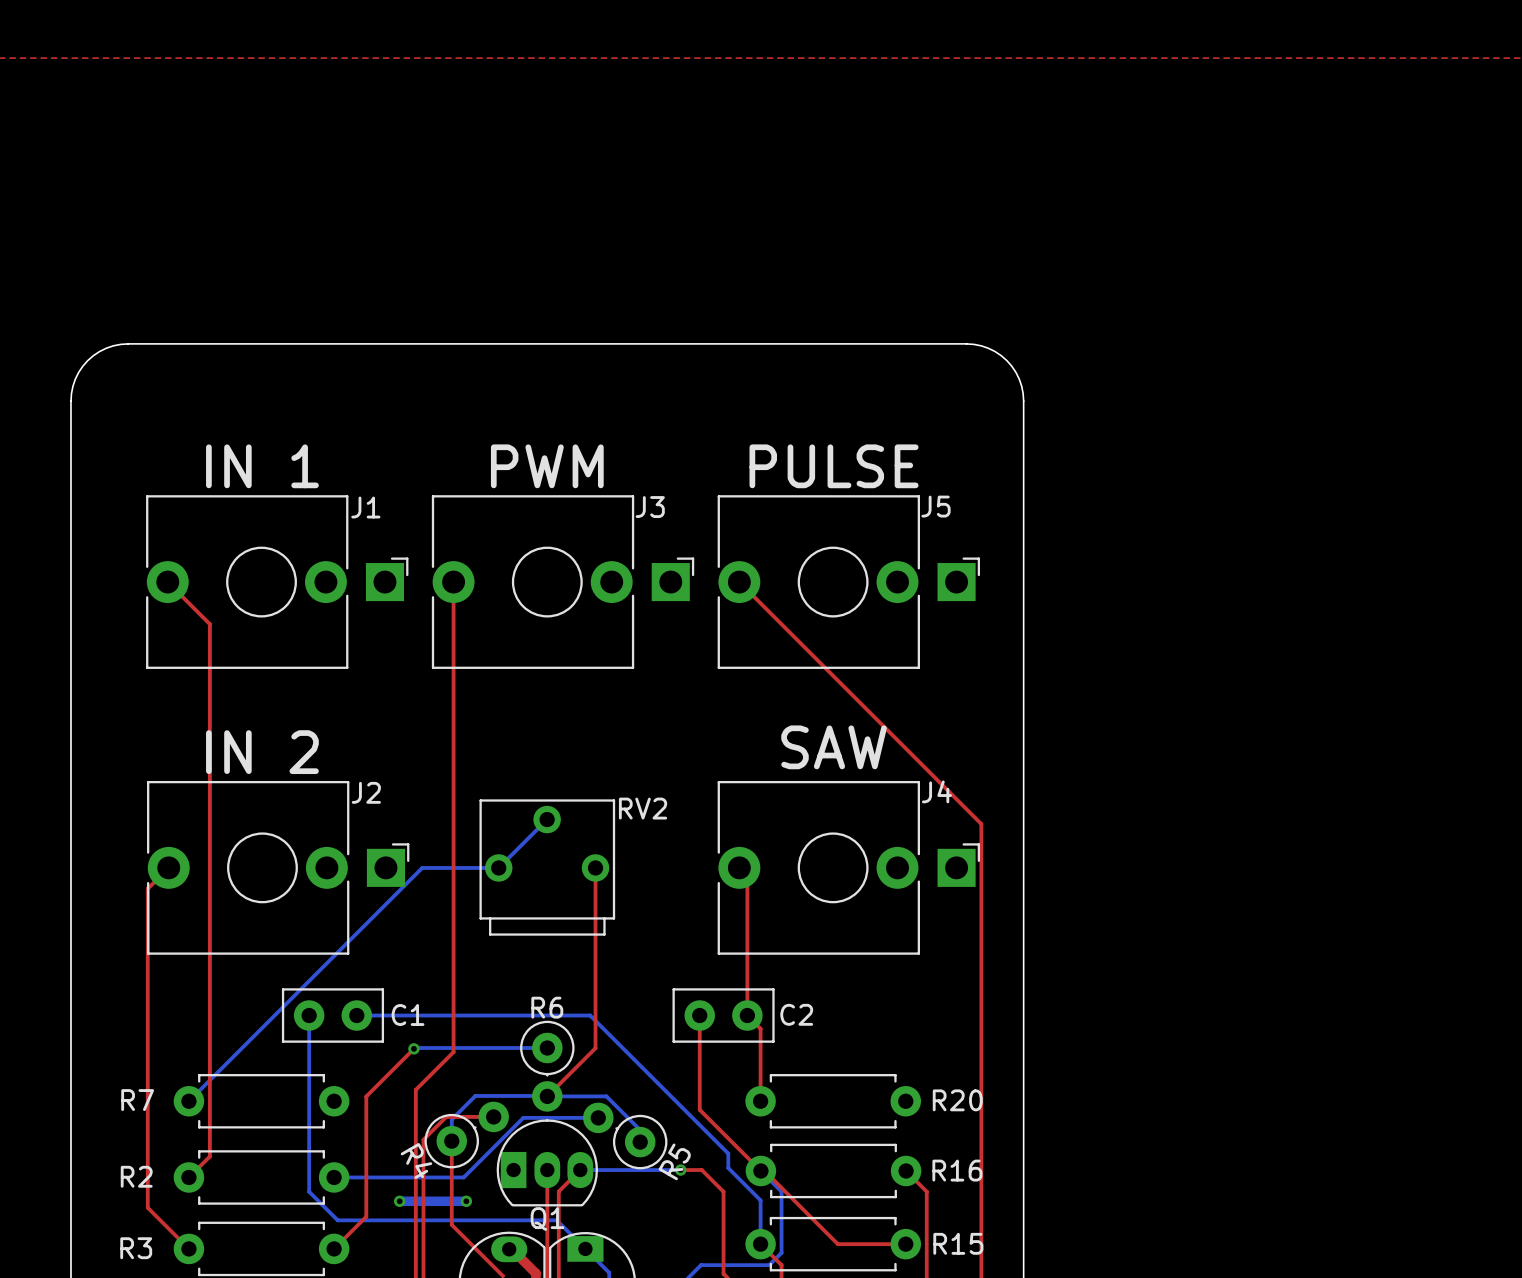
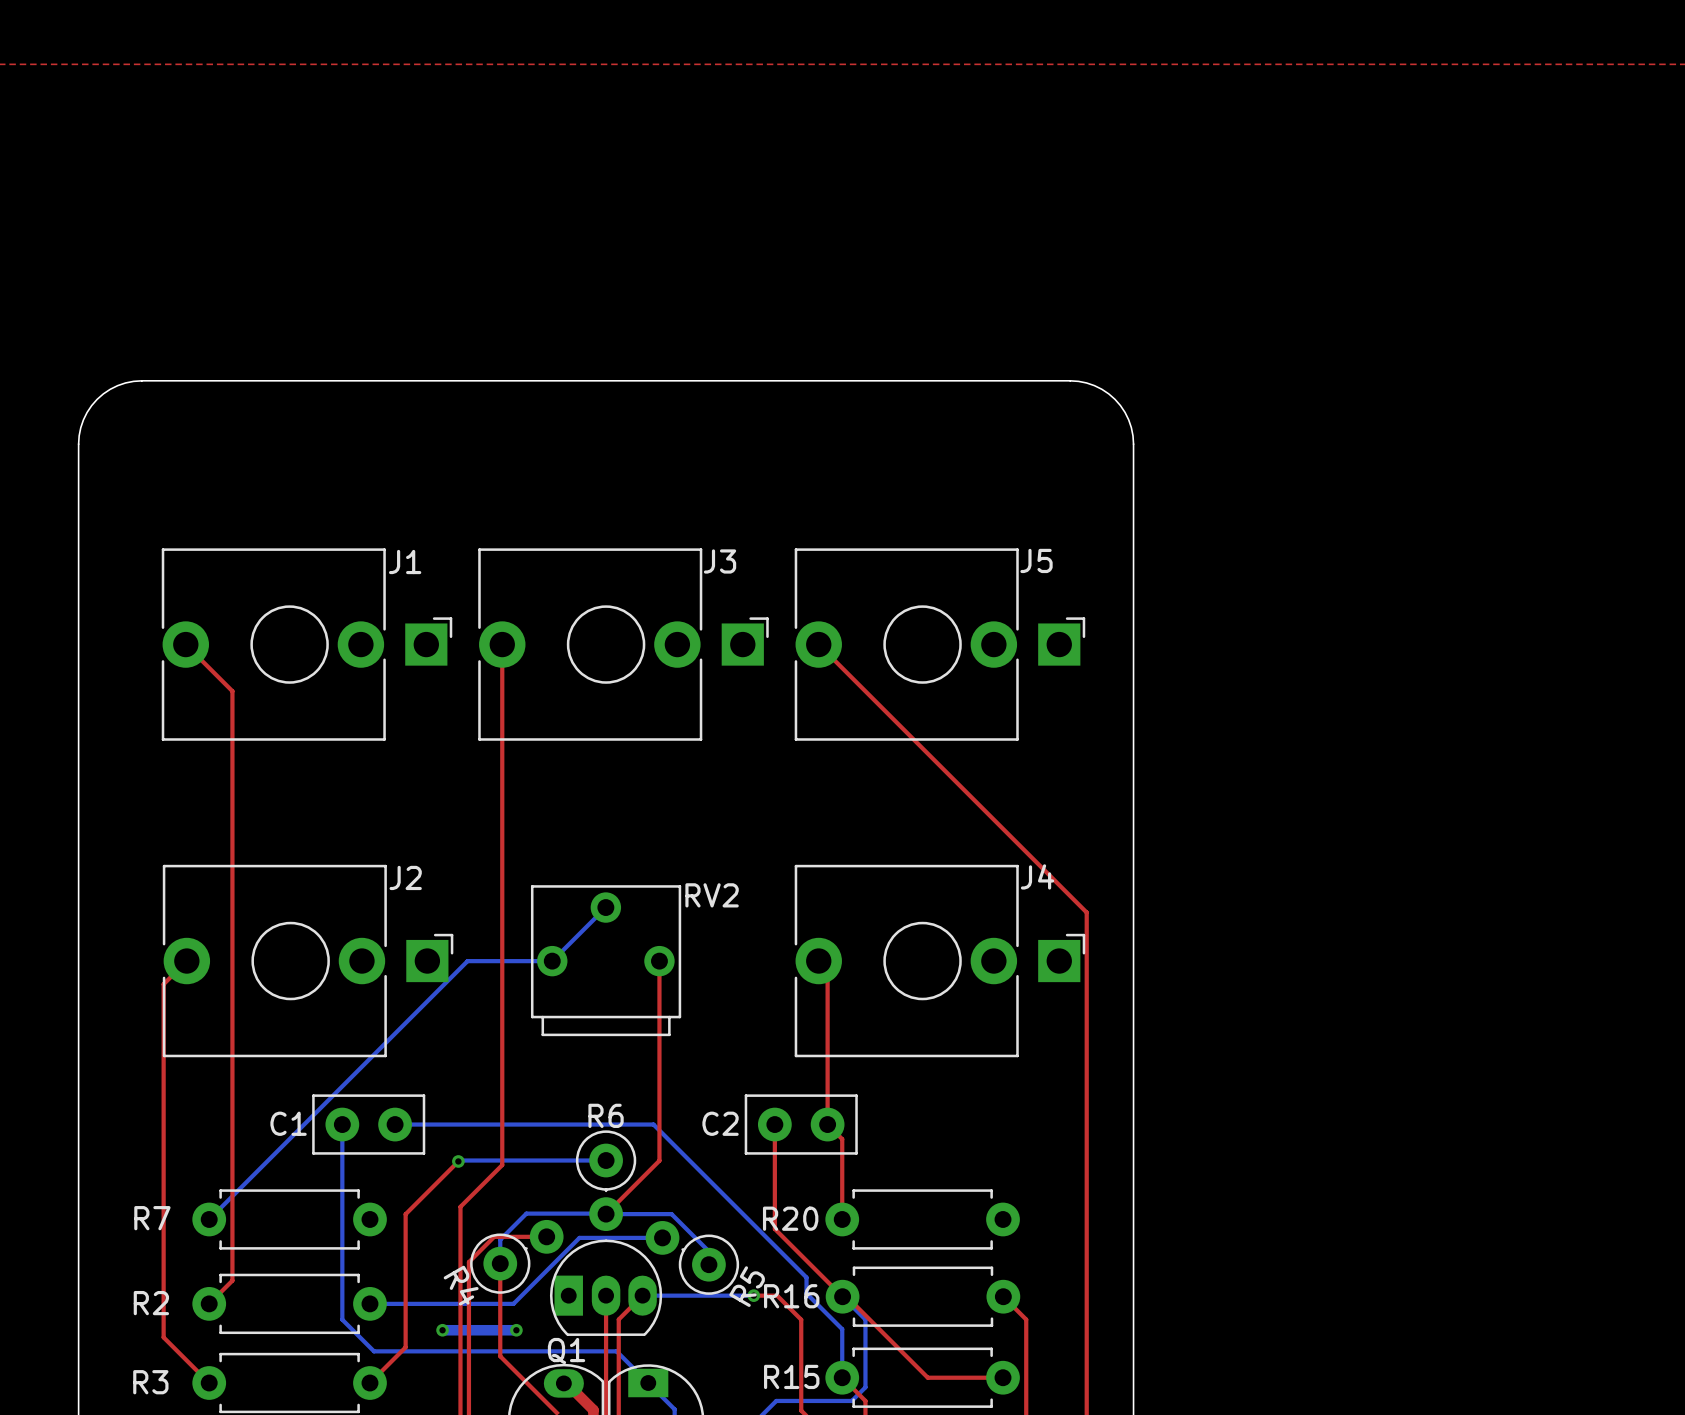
text: IN 1 (262, 466) -> none
text: PWM (547, 466) -> none
text: PULSE (834, 466) -> none
text: SAW (834, 747) -> none
text: IN 2 (262, 752) -> none
C2 name position: C2 (796, 1014) -> C2 (720, 1123)
C1 name position: C1 (408, 1015) -> C1 (288, 1123)
R20 name position: R20 (957, 1100) -> R20 (790, 1218)
R16 name position: R16 (957, 1170) -> R16 (791, 1296)
Q1 name position: Q1 (547, 1219) -> Q1 (566, 1351)
R15 name position: R15 (958, 1243) -> R15 (791, 1376)

